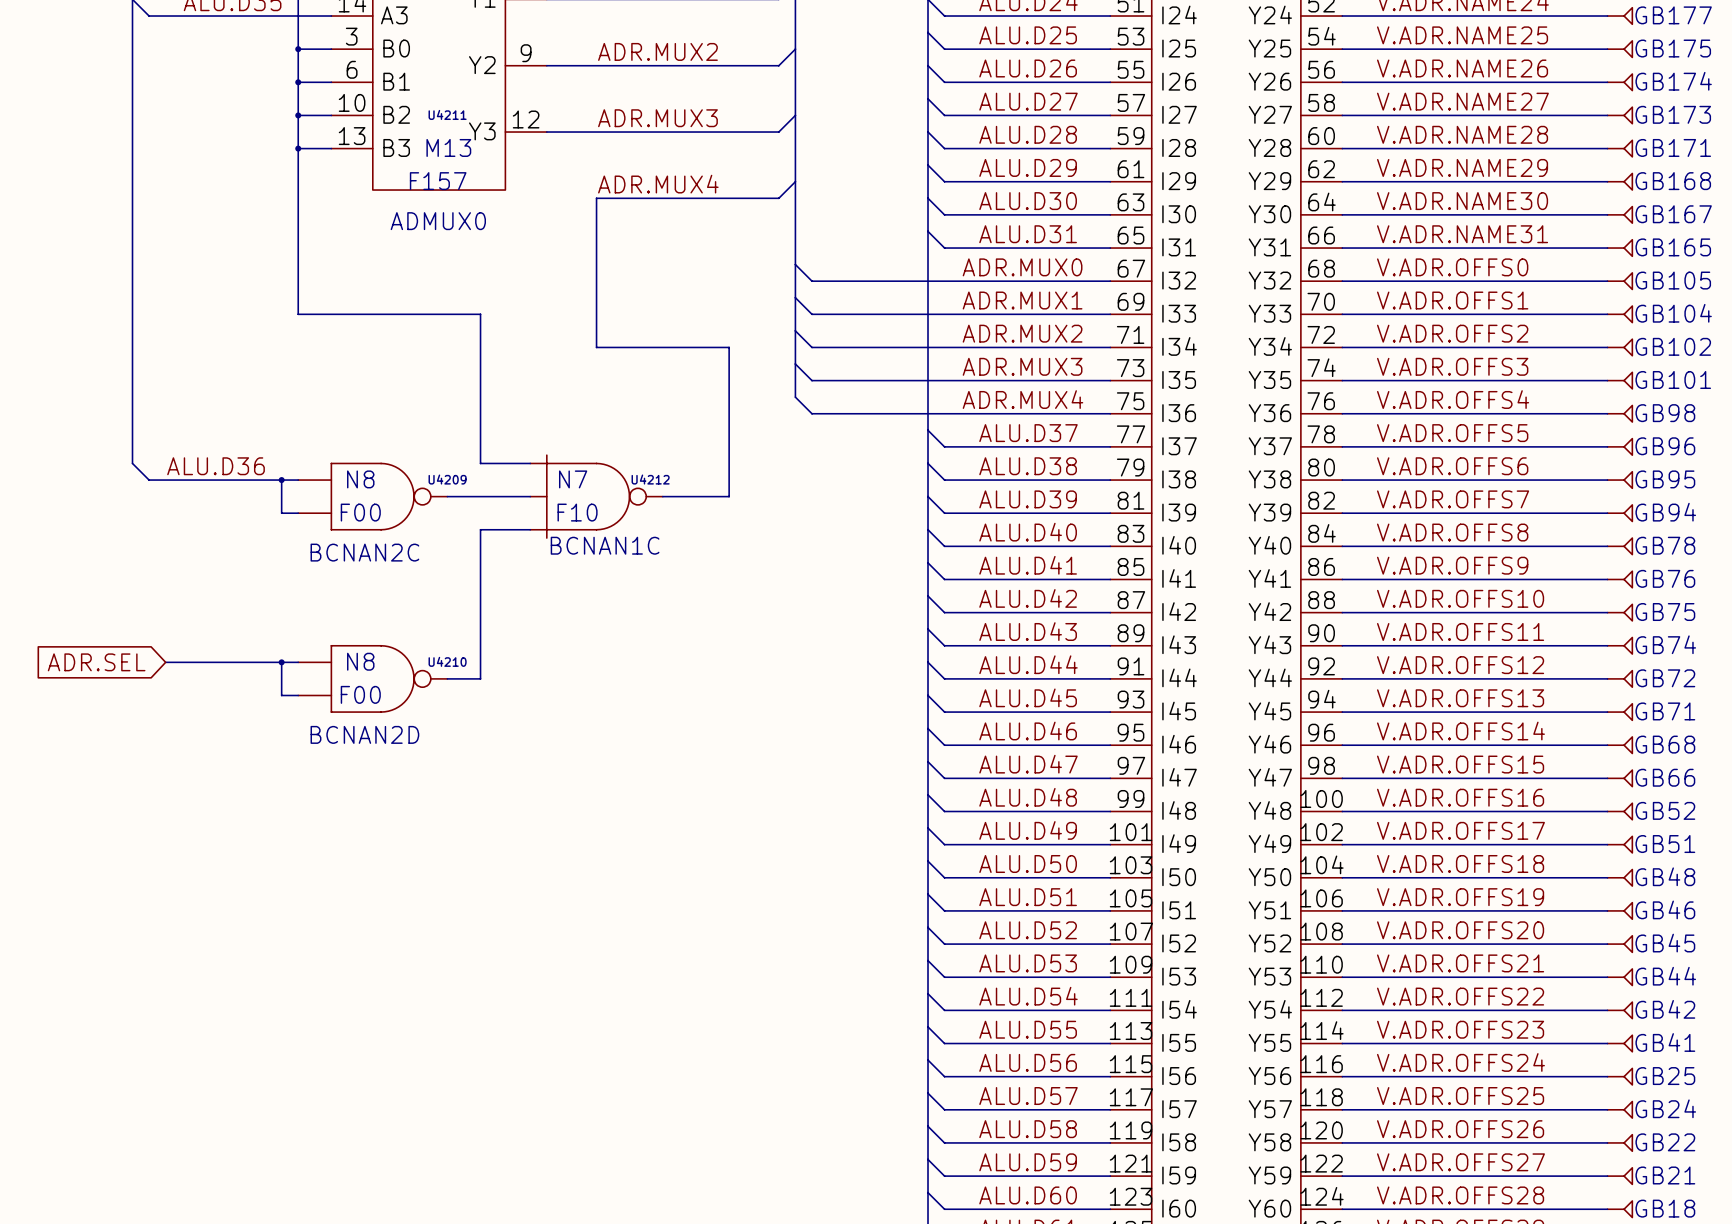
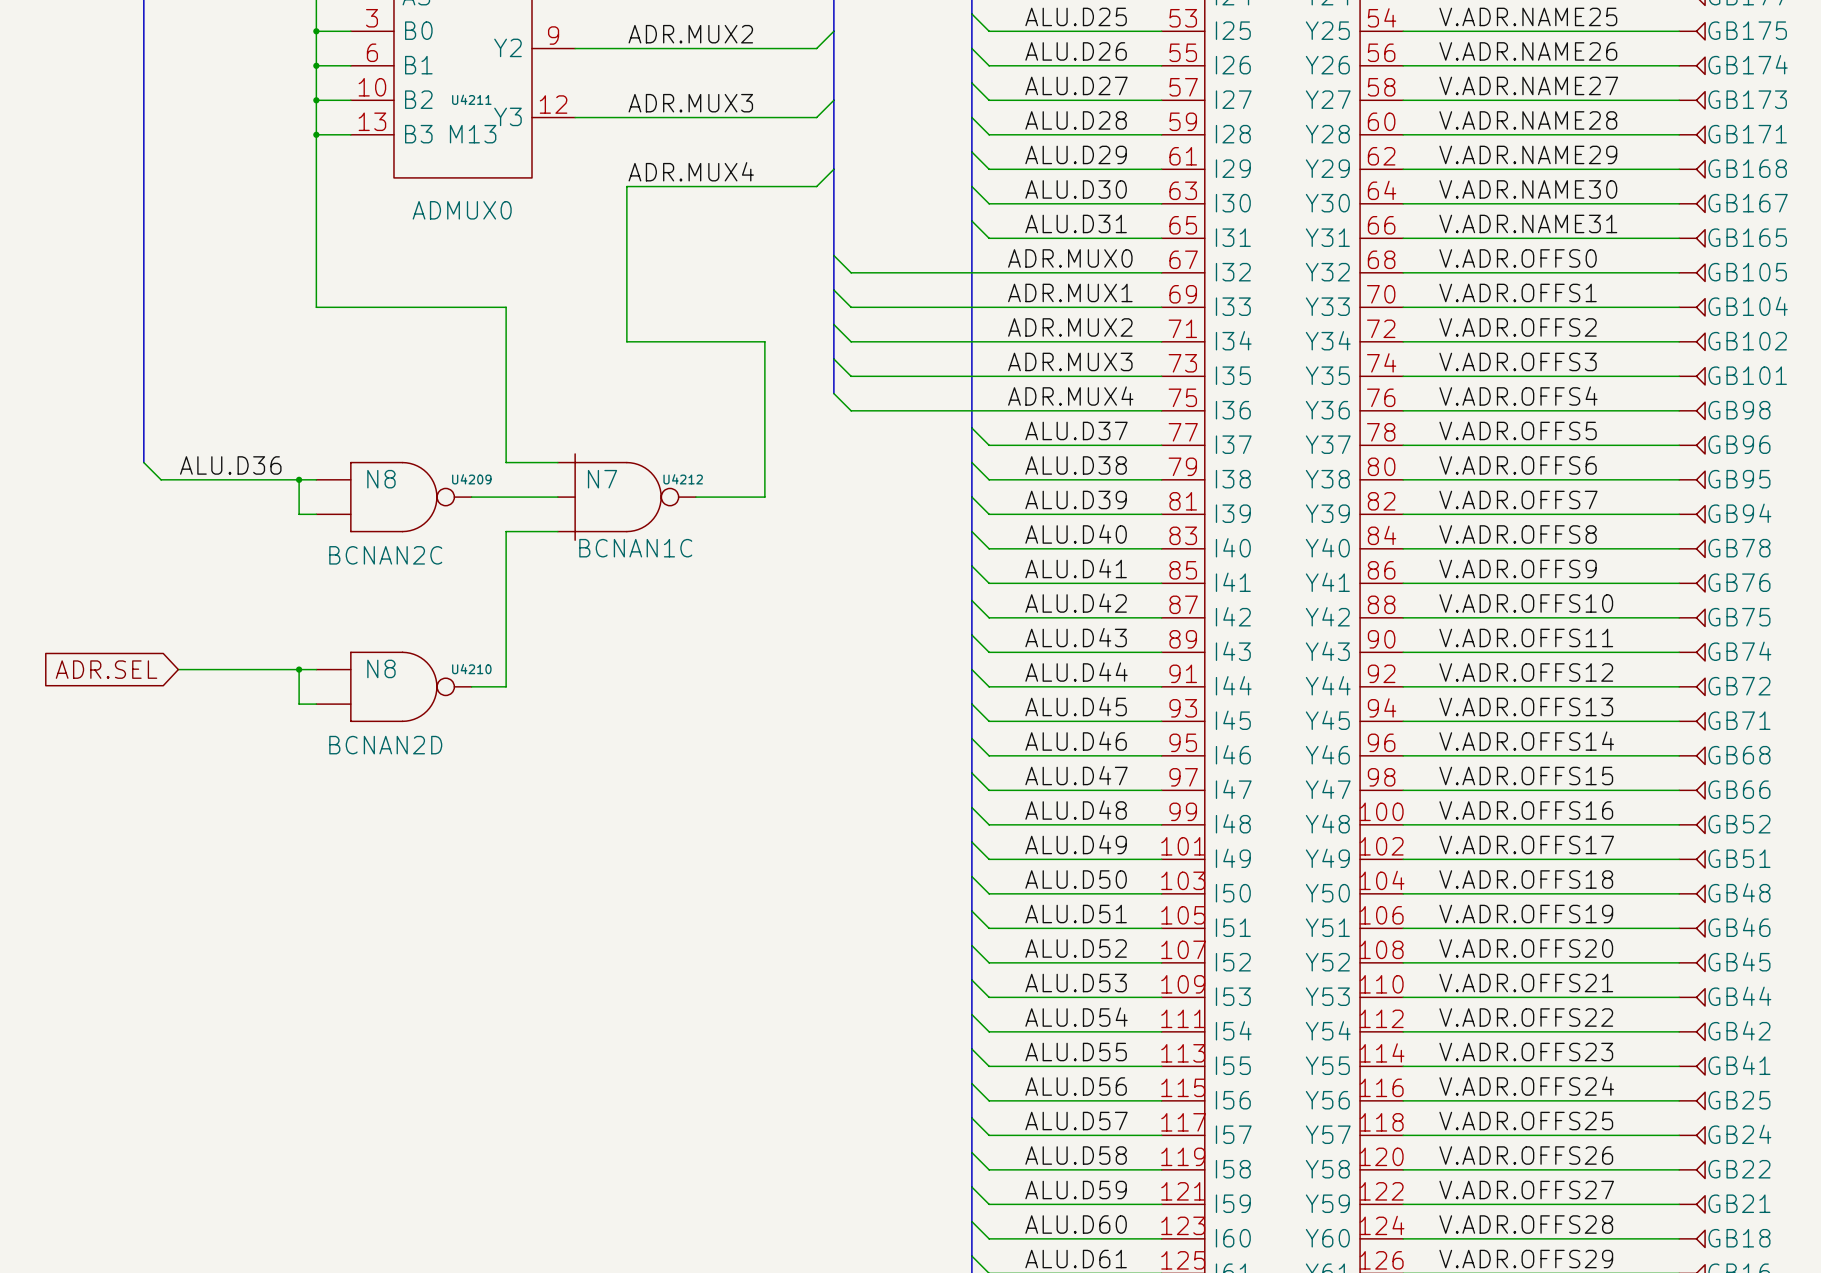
U4211 value: F157 (438, 181) -> none
U4209 value: F00 (360, 512) -> none
U4212 value: F10 (577, 512) -> none
U4210 value: F00 (360, 694) -> none

